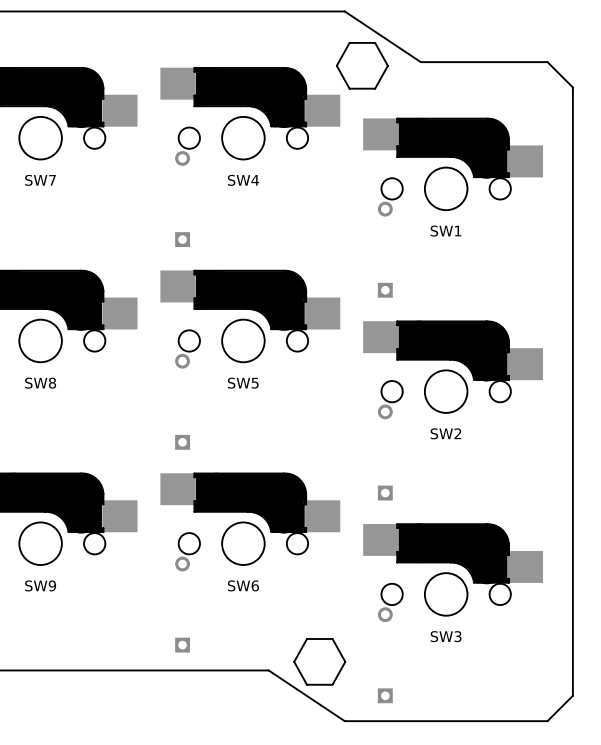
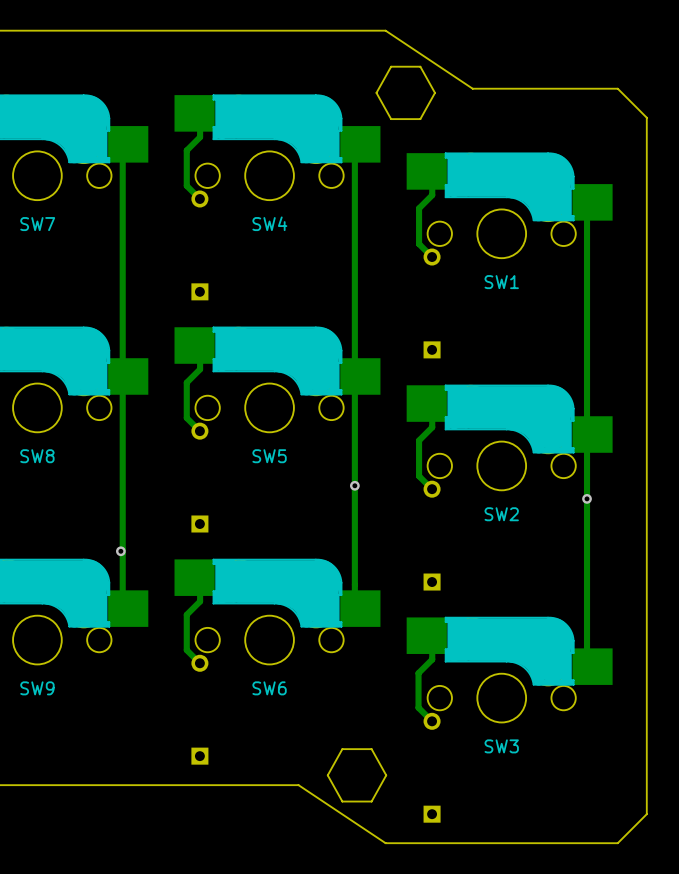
track: none -> (200, 113) (200, 137) (186, 150) (186, 185) (199, 198)
track: none -> (122, 144) (122, 549) (120, 551) (122, 553) (122, 608)
track: none -> (354, 144) (354, 608)
track: none -> (432, 171) (432, 195) (419, 208) (419, 244) (432, 257)
track: none -> (587, 202) (587, 666)
track: none -> (200, 345) (200, 369) (186, 382) (186, 417) (199, 431)
track: none -> (432, 403) (432, 427) (419, 440) (419, 476) (432, 489)
via: none -> (354, 485)
via: none -> (587, 498)
via: none -> (120, 551)
track: none -> (200, 577) (200, 601) (186, 614) (186, 650) (199, 663)
track: none -> (432, 635) (432, 659) (418, 673) (418, 707) (432, 721)

